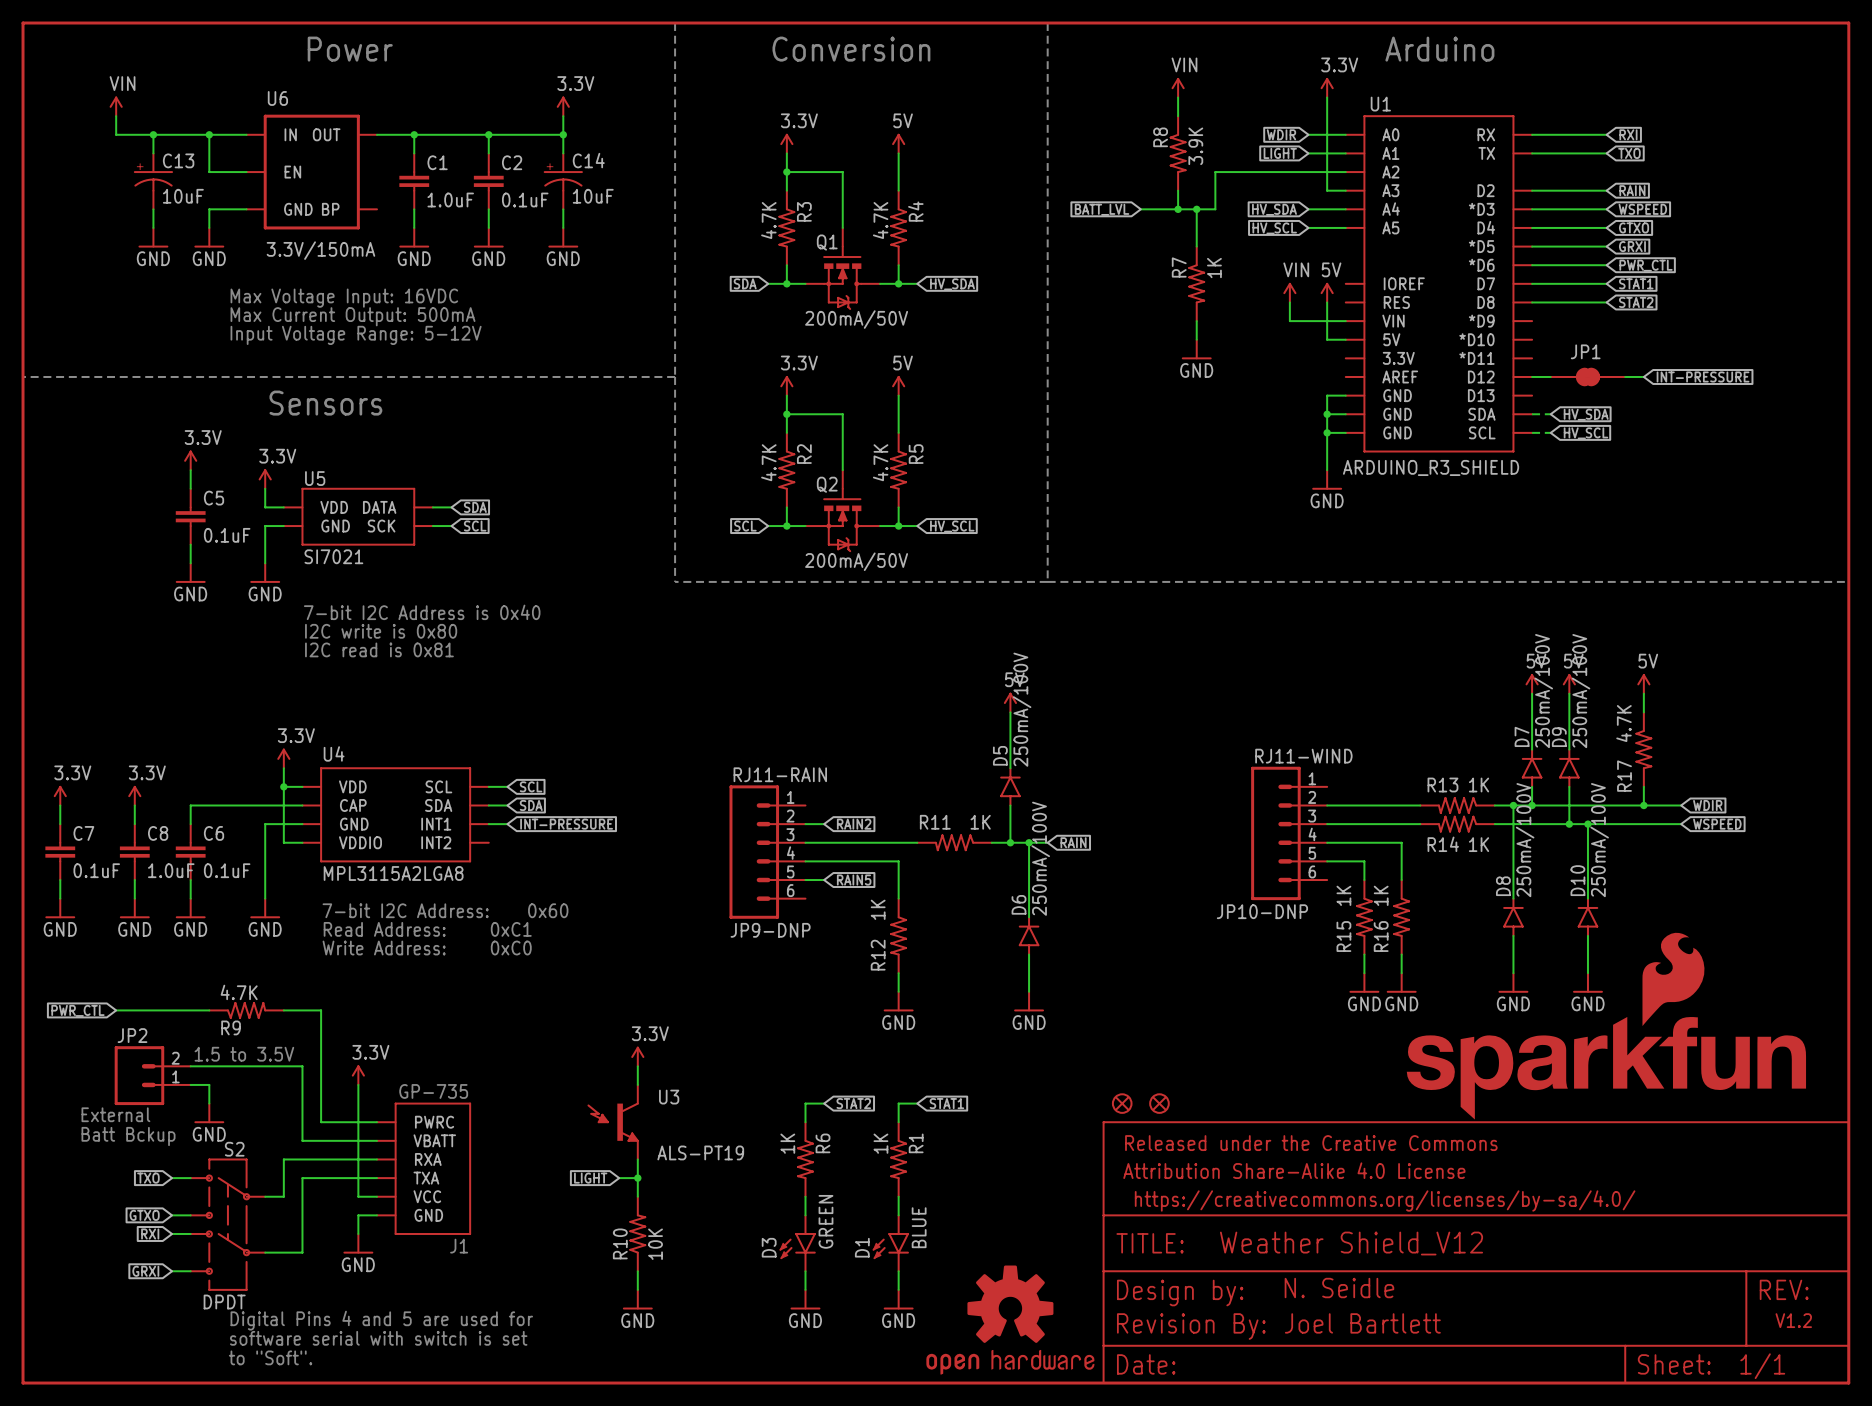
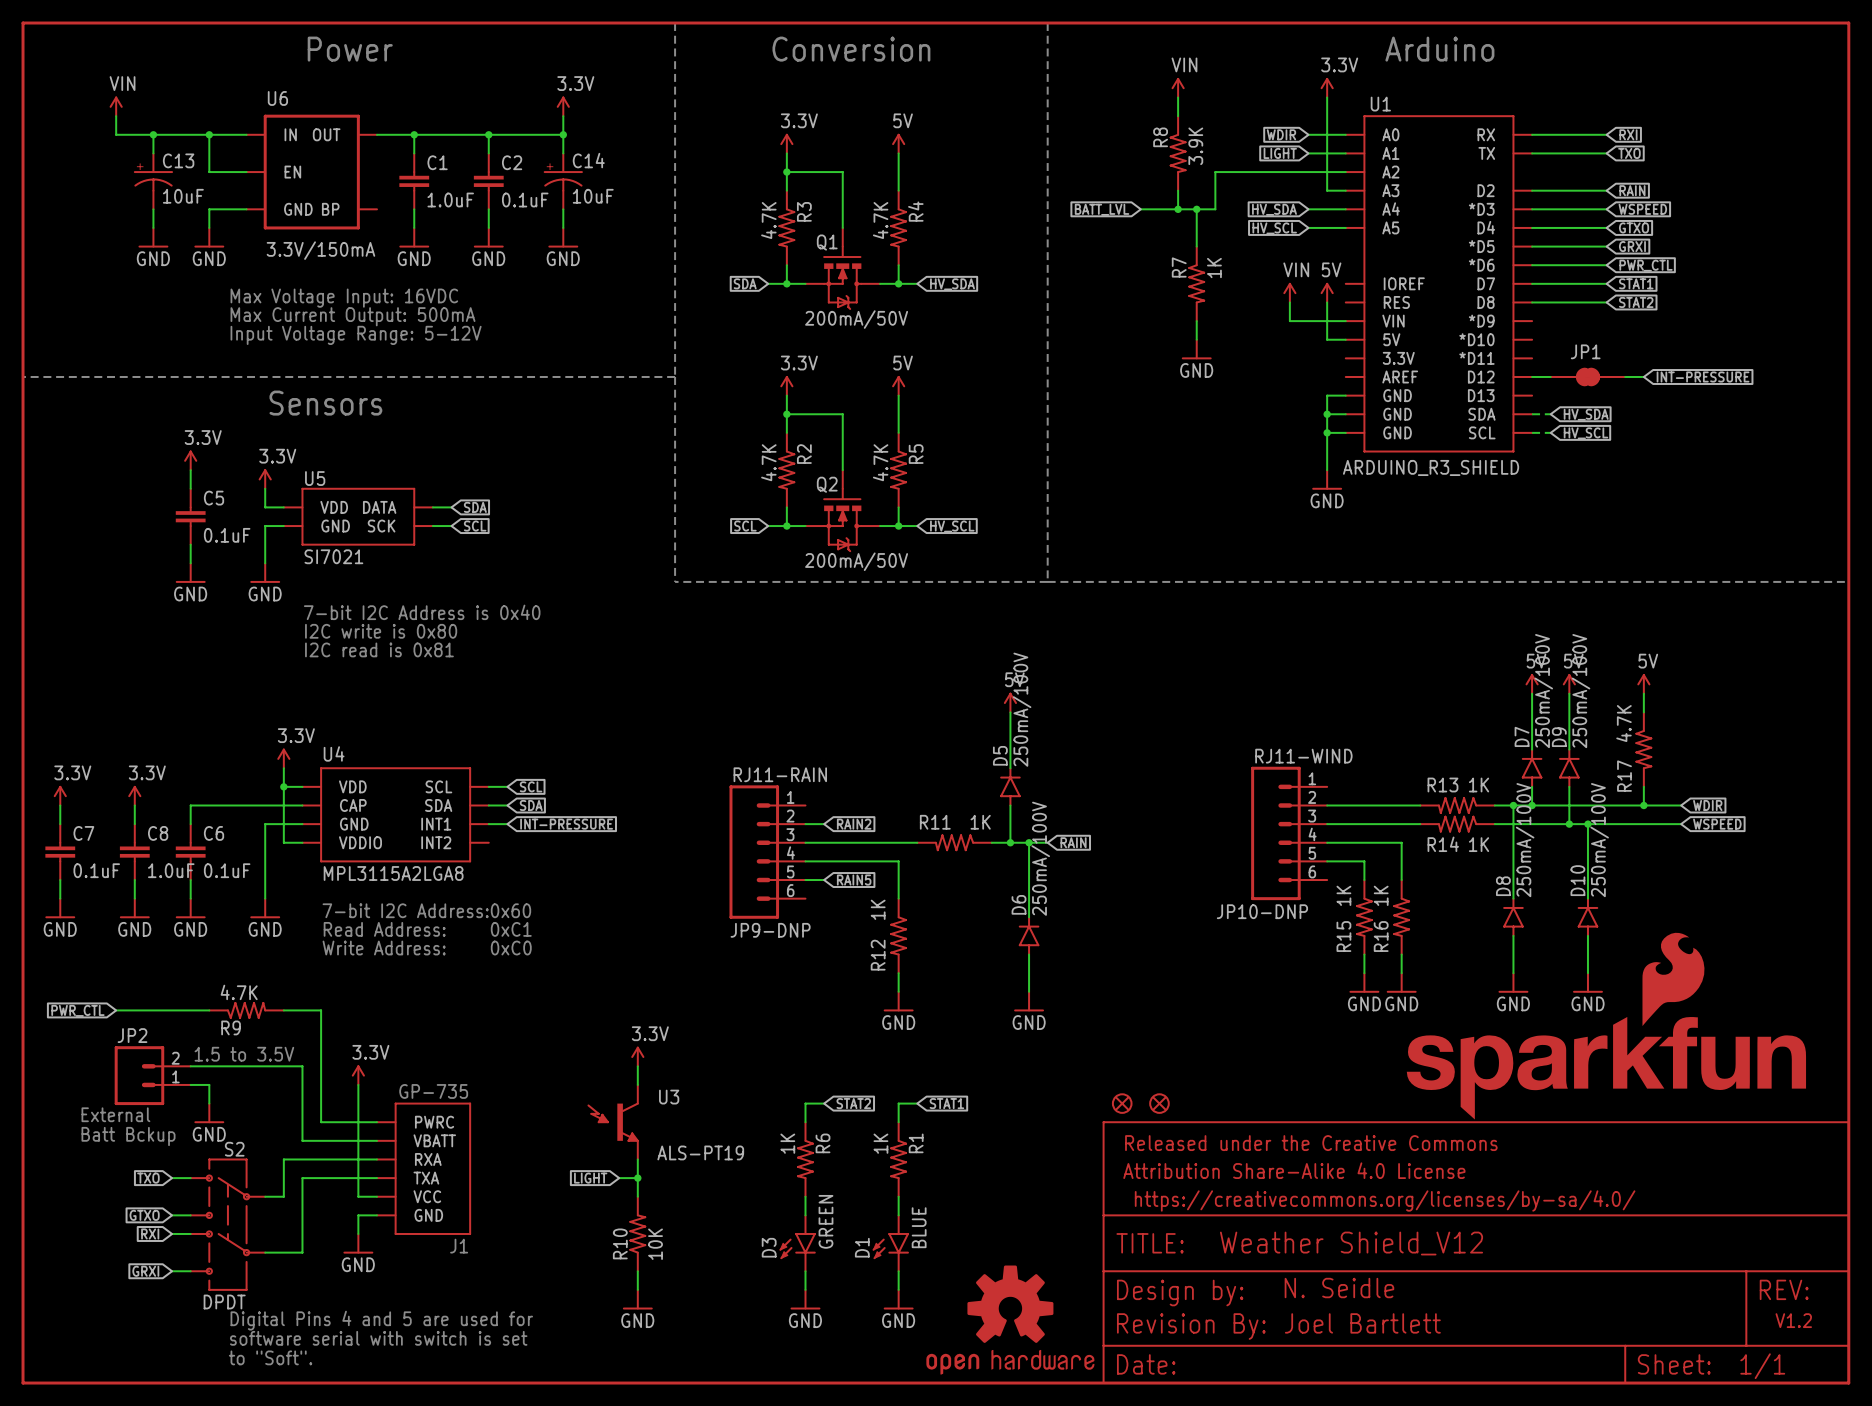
text position: 0x60 (548, 910) -> 0x60 (510, 910)

